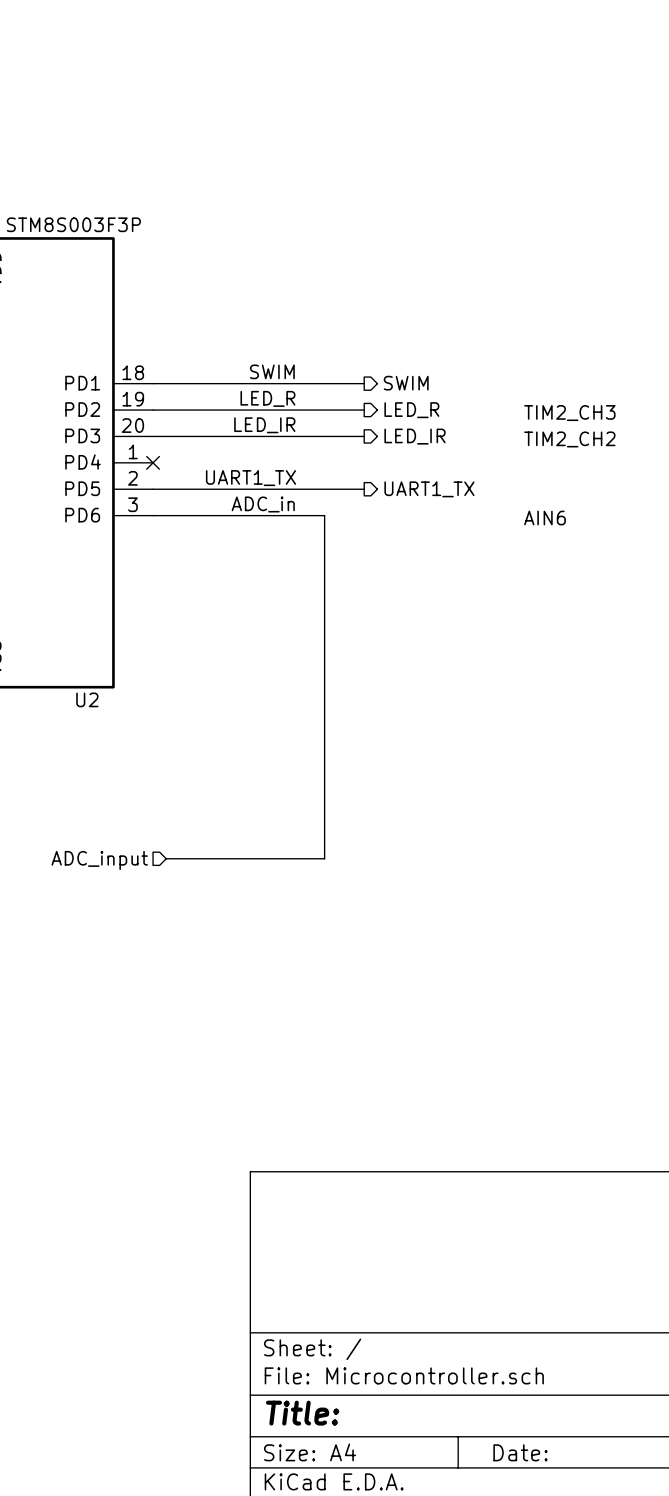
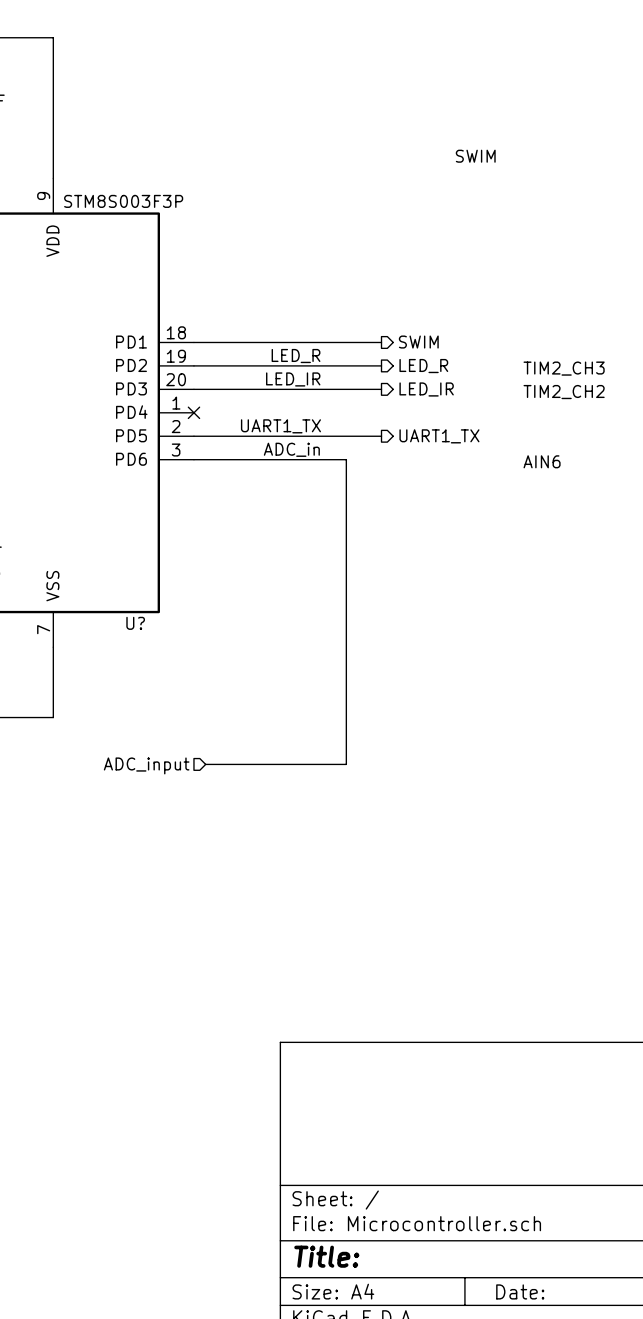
label: none -> SWIM (475, 156)
label: SWIM (272, 371) -> none
U2 name: U2 (87, 699) -> U? (135, 623)

